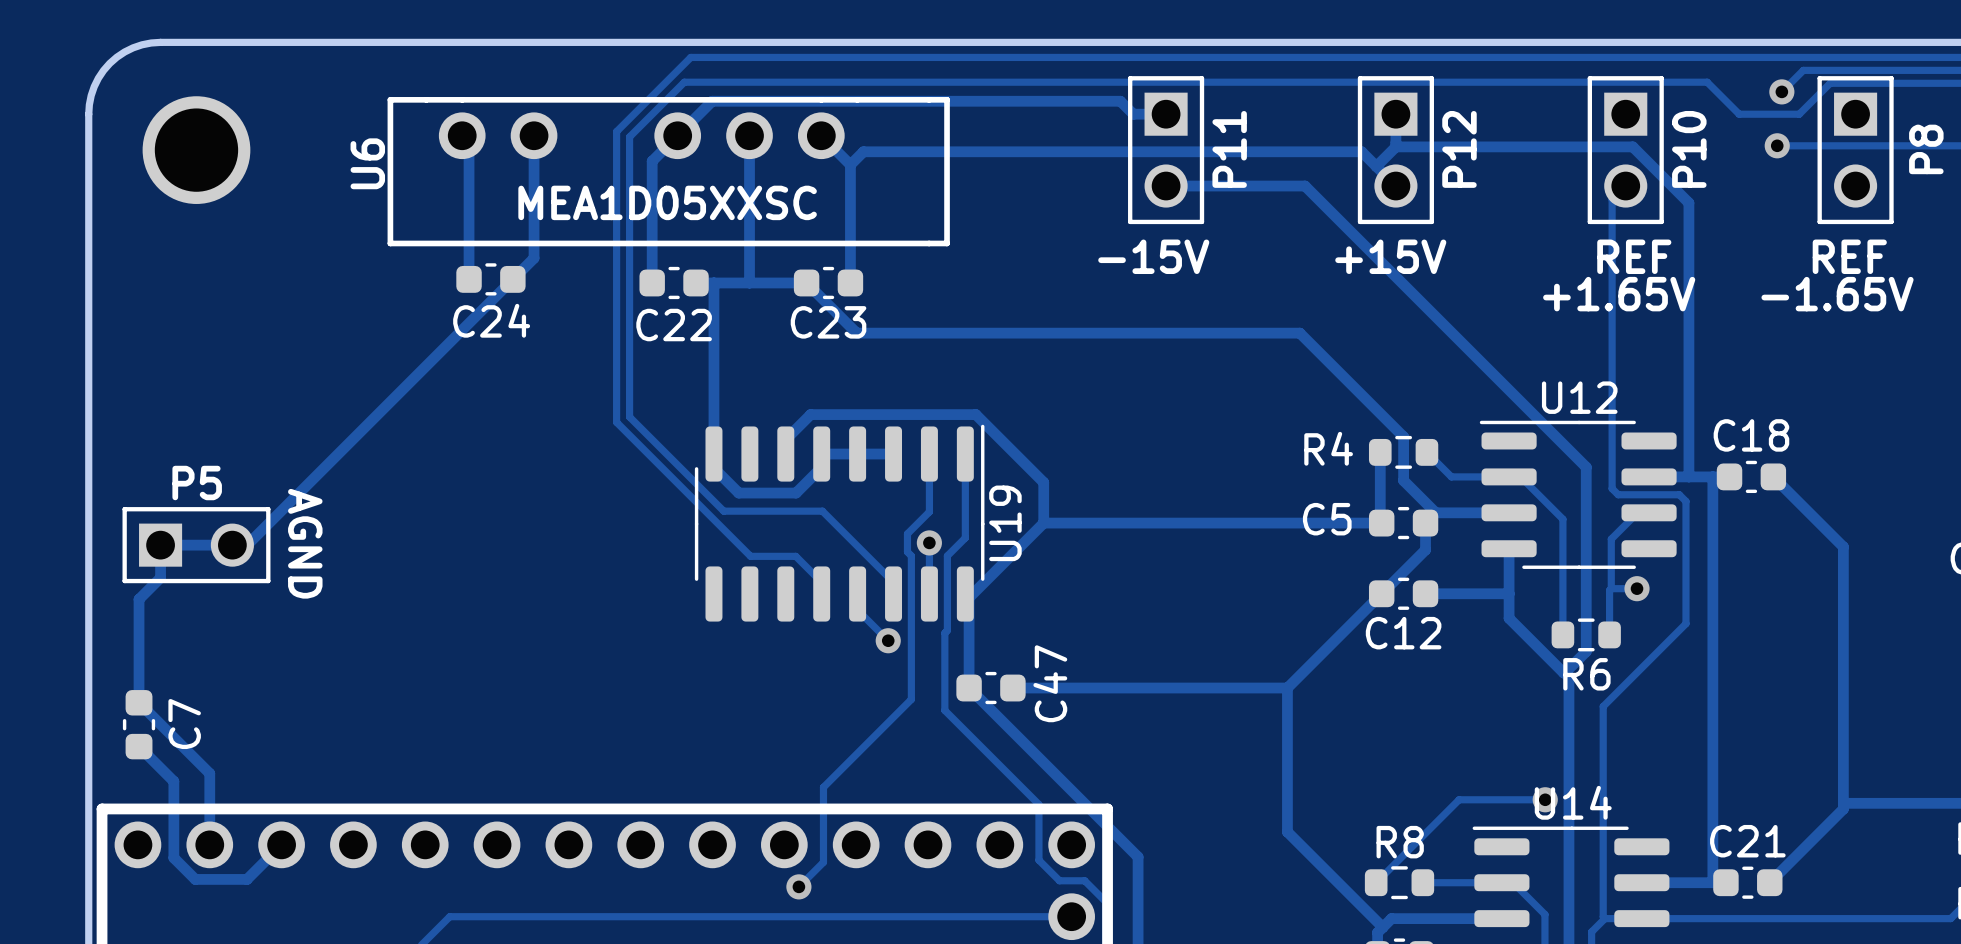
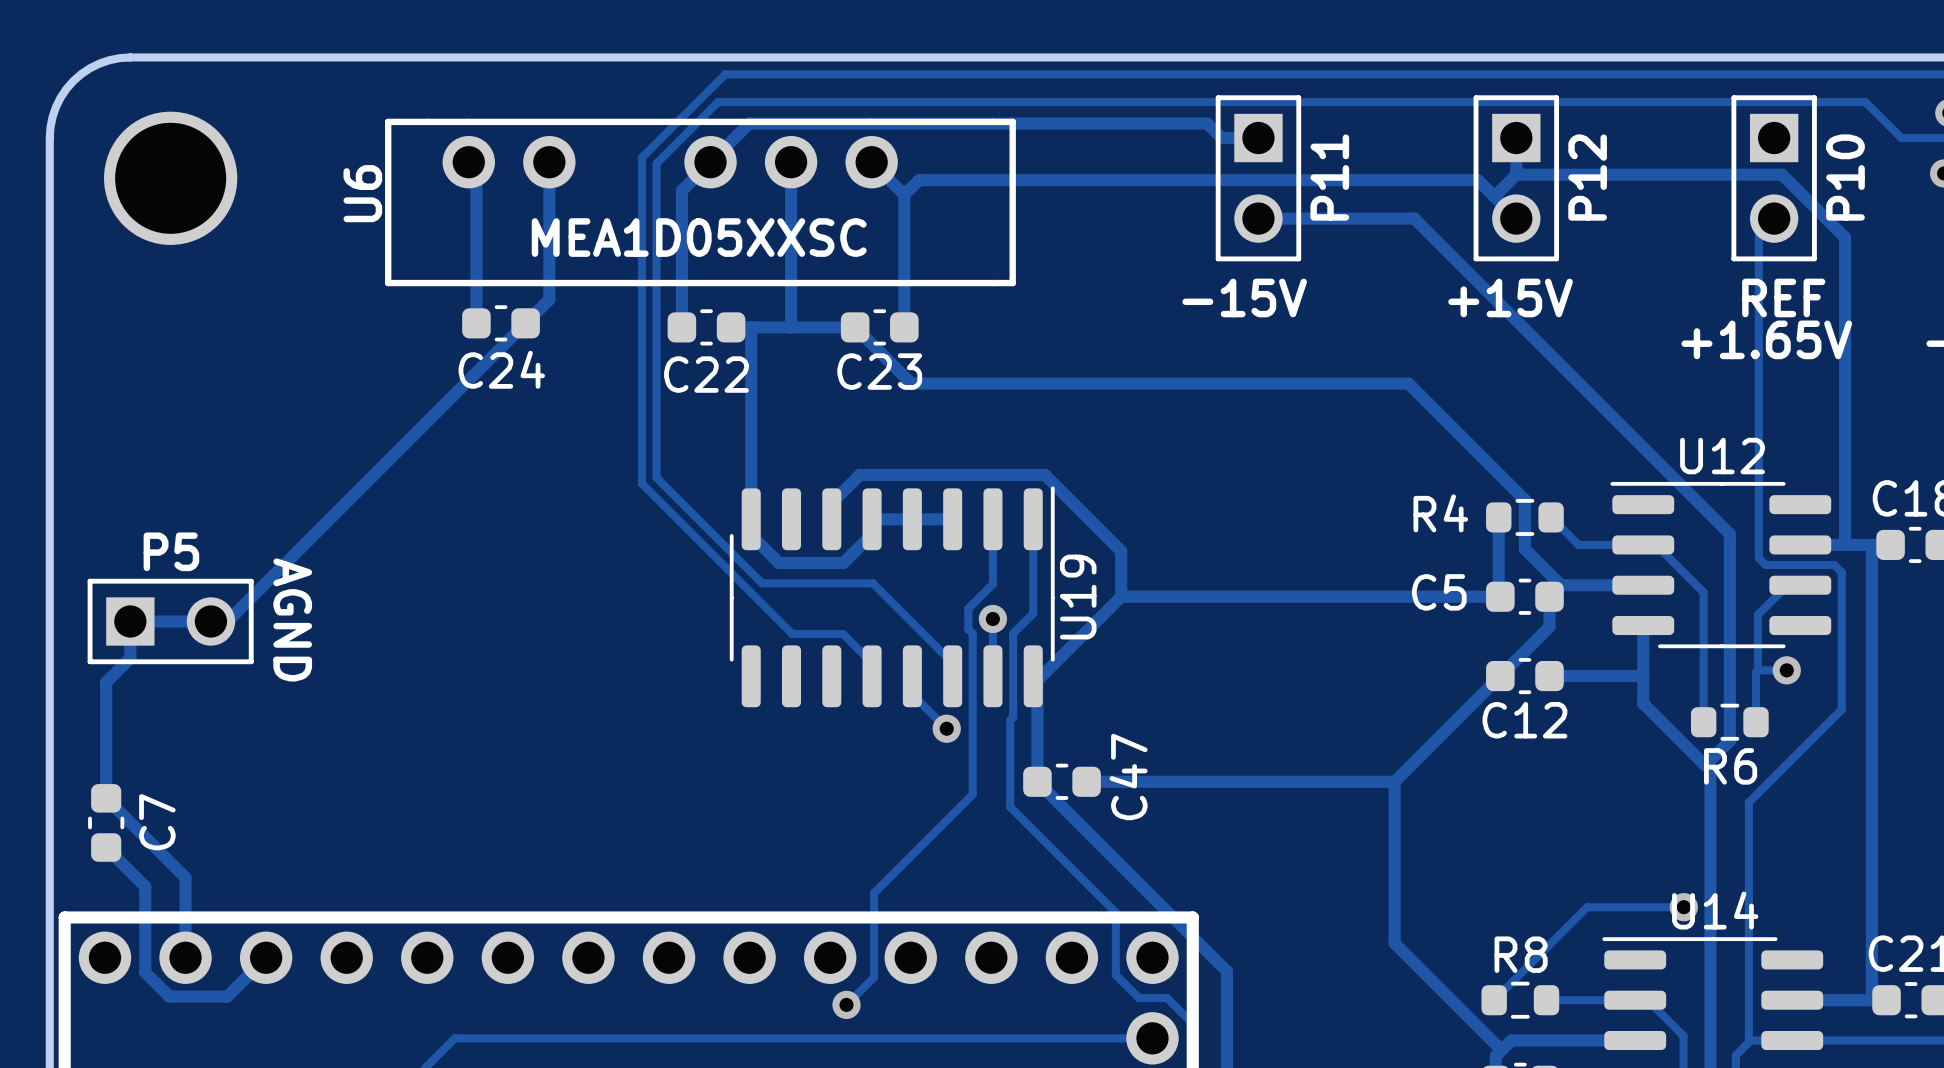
part footprint: [142, 96, 251, 204] -> [104, 111, 238, 245]

